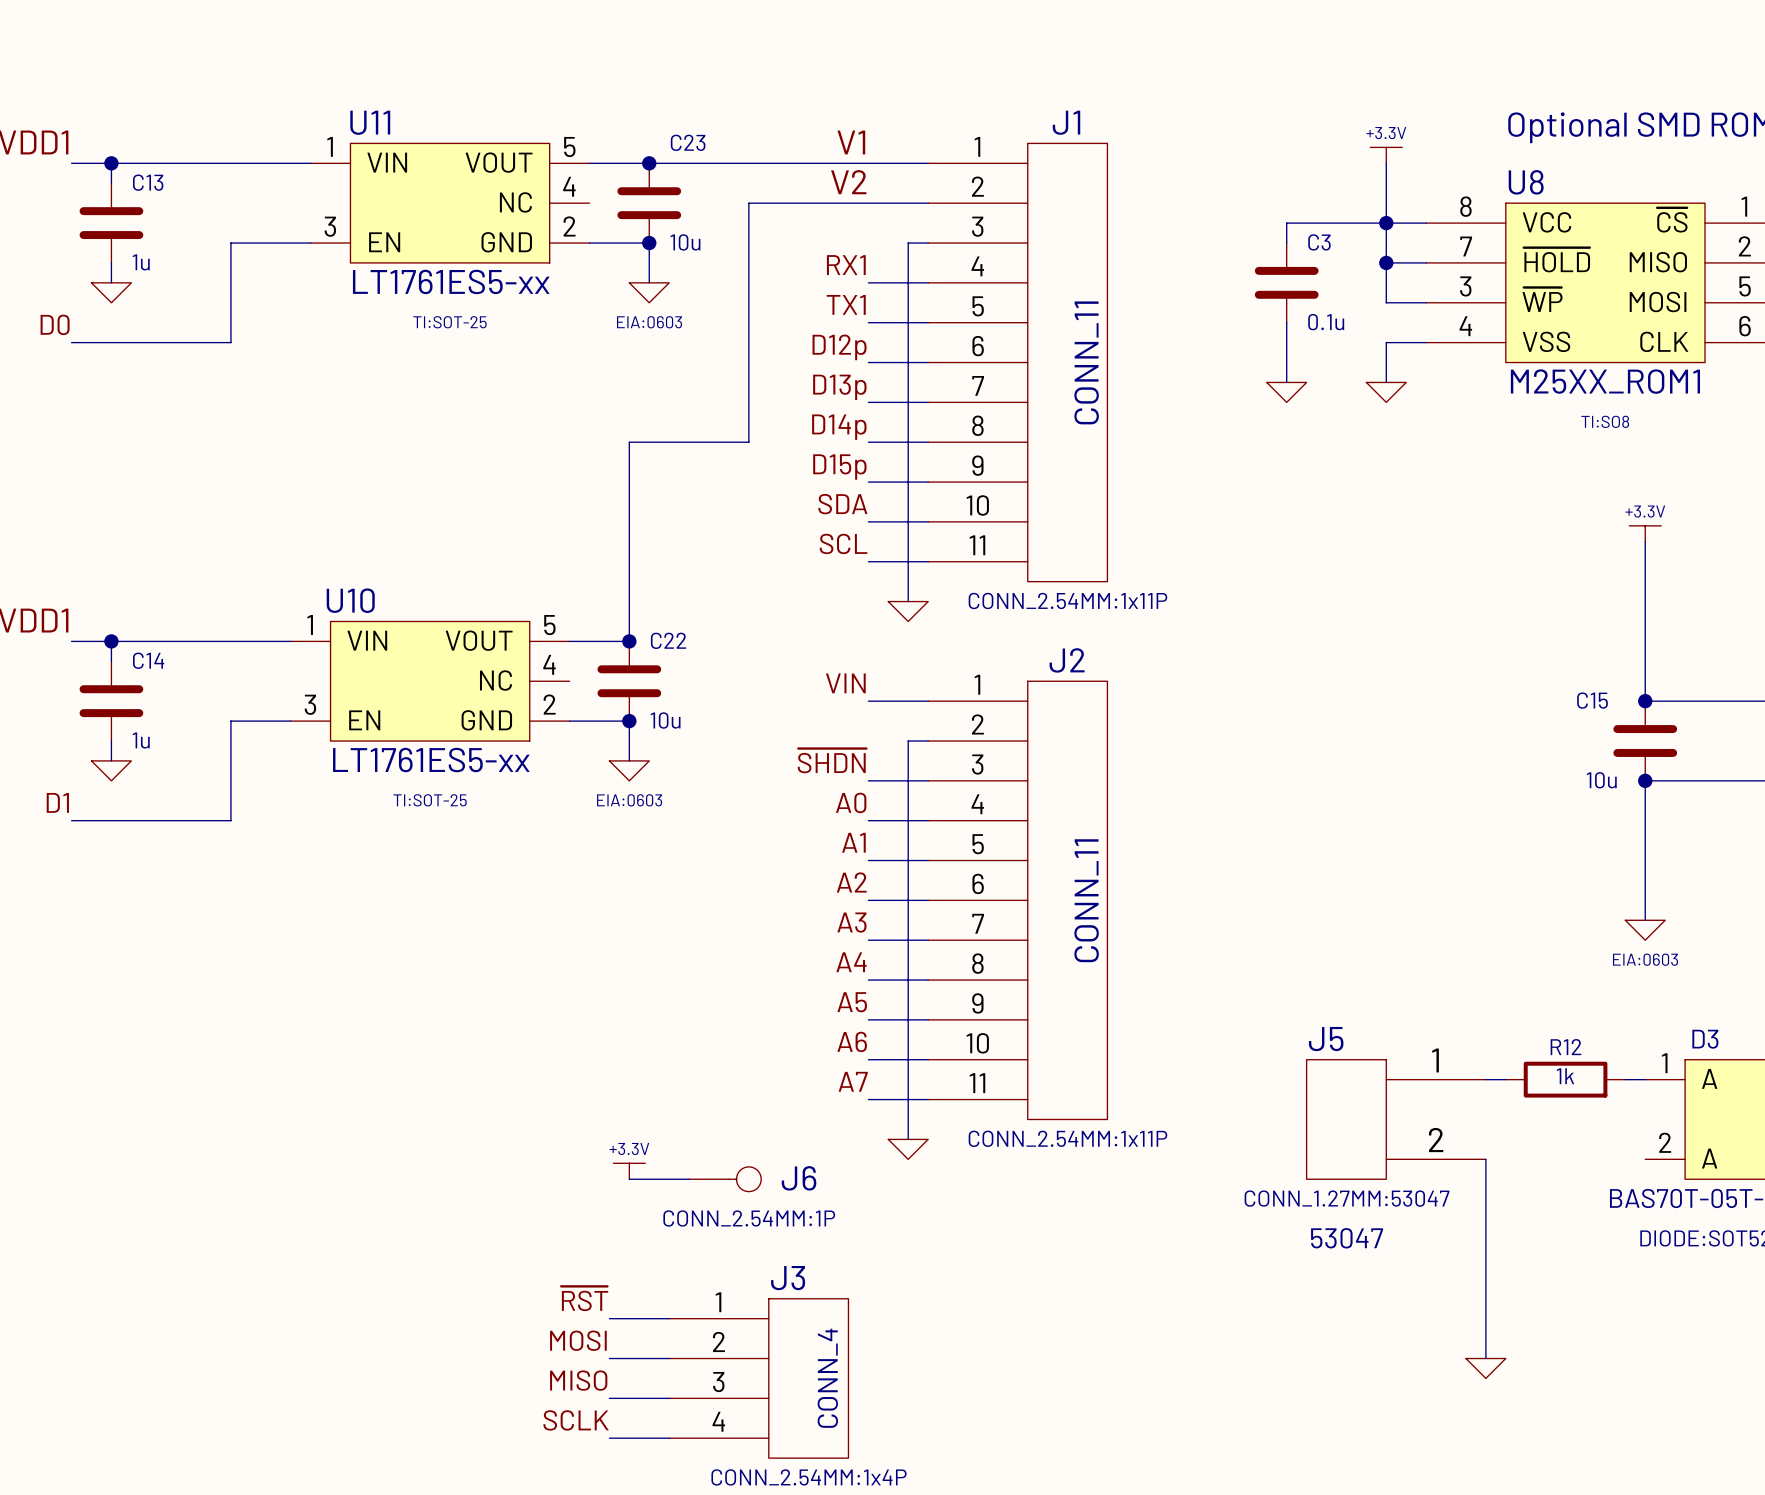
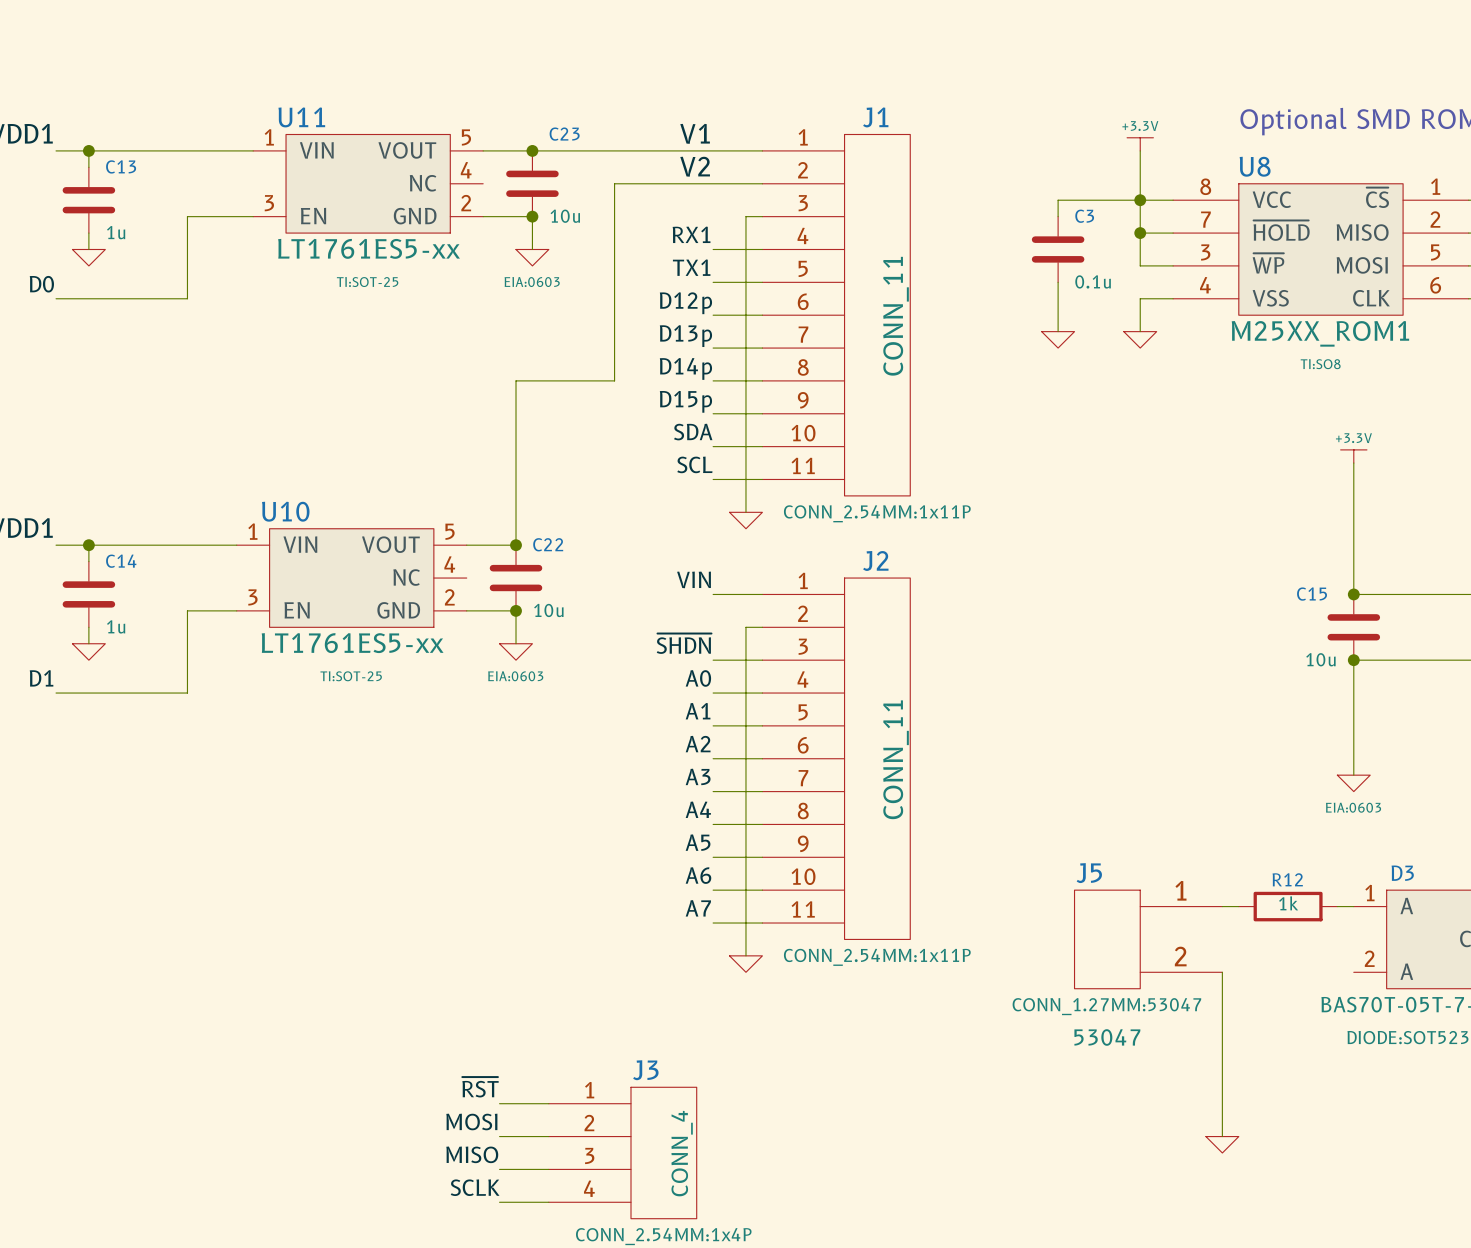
power symbol: +3.3V (629, 1171) -> none
wire: (629, 1179) (689, 1179) -> none
J6: (725, 1179) -> none

